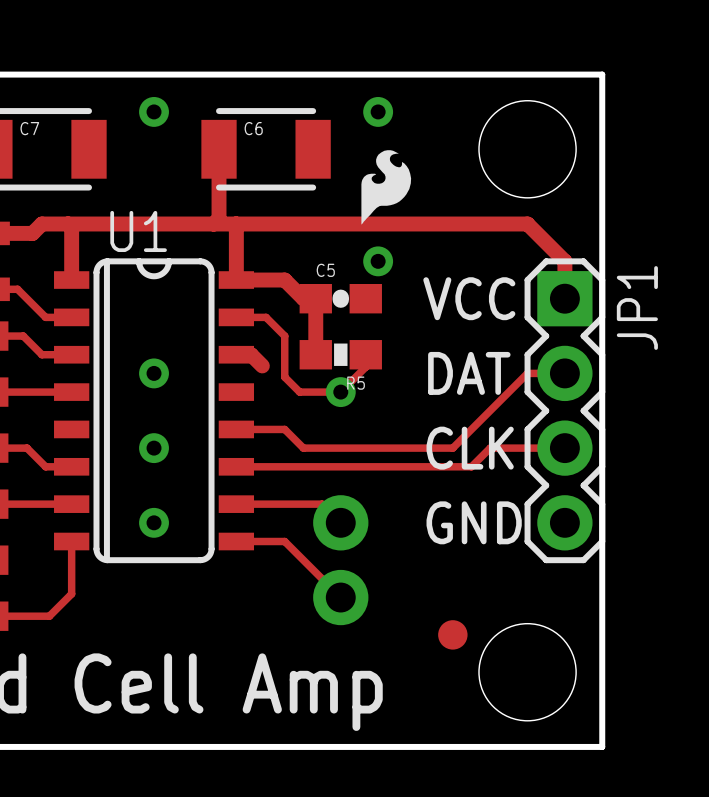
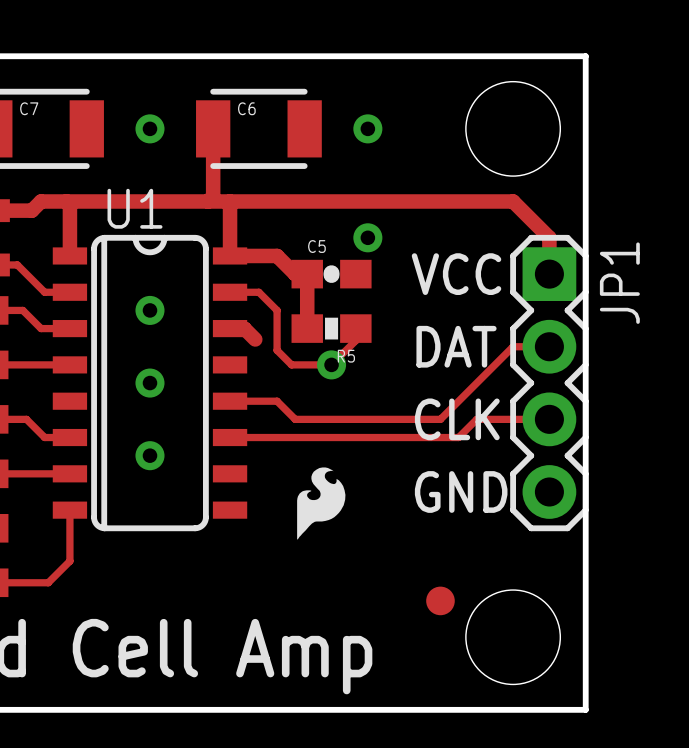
via position: (154, 111) -> (149, 128)
via position: (378, 111) -> (367, 128)
drawing position: (386, 187) -> (321, 503)
via: none -> (149, 310)
via: (154, 373) -> none
via: none -> (149, 383)
via: (154, 448) -> none
via: none -> (149, 455)
track: (236, 504) (322, 504) (340, 522) -> none
via: (154, 522) -> none
track: (236, 541) (284, 541) (340, 597) -> none
part: (340, 560) -> none

